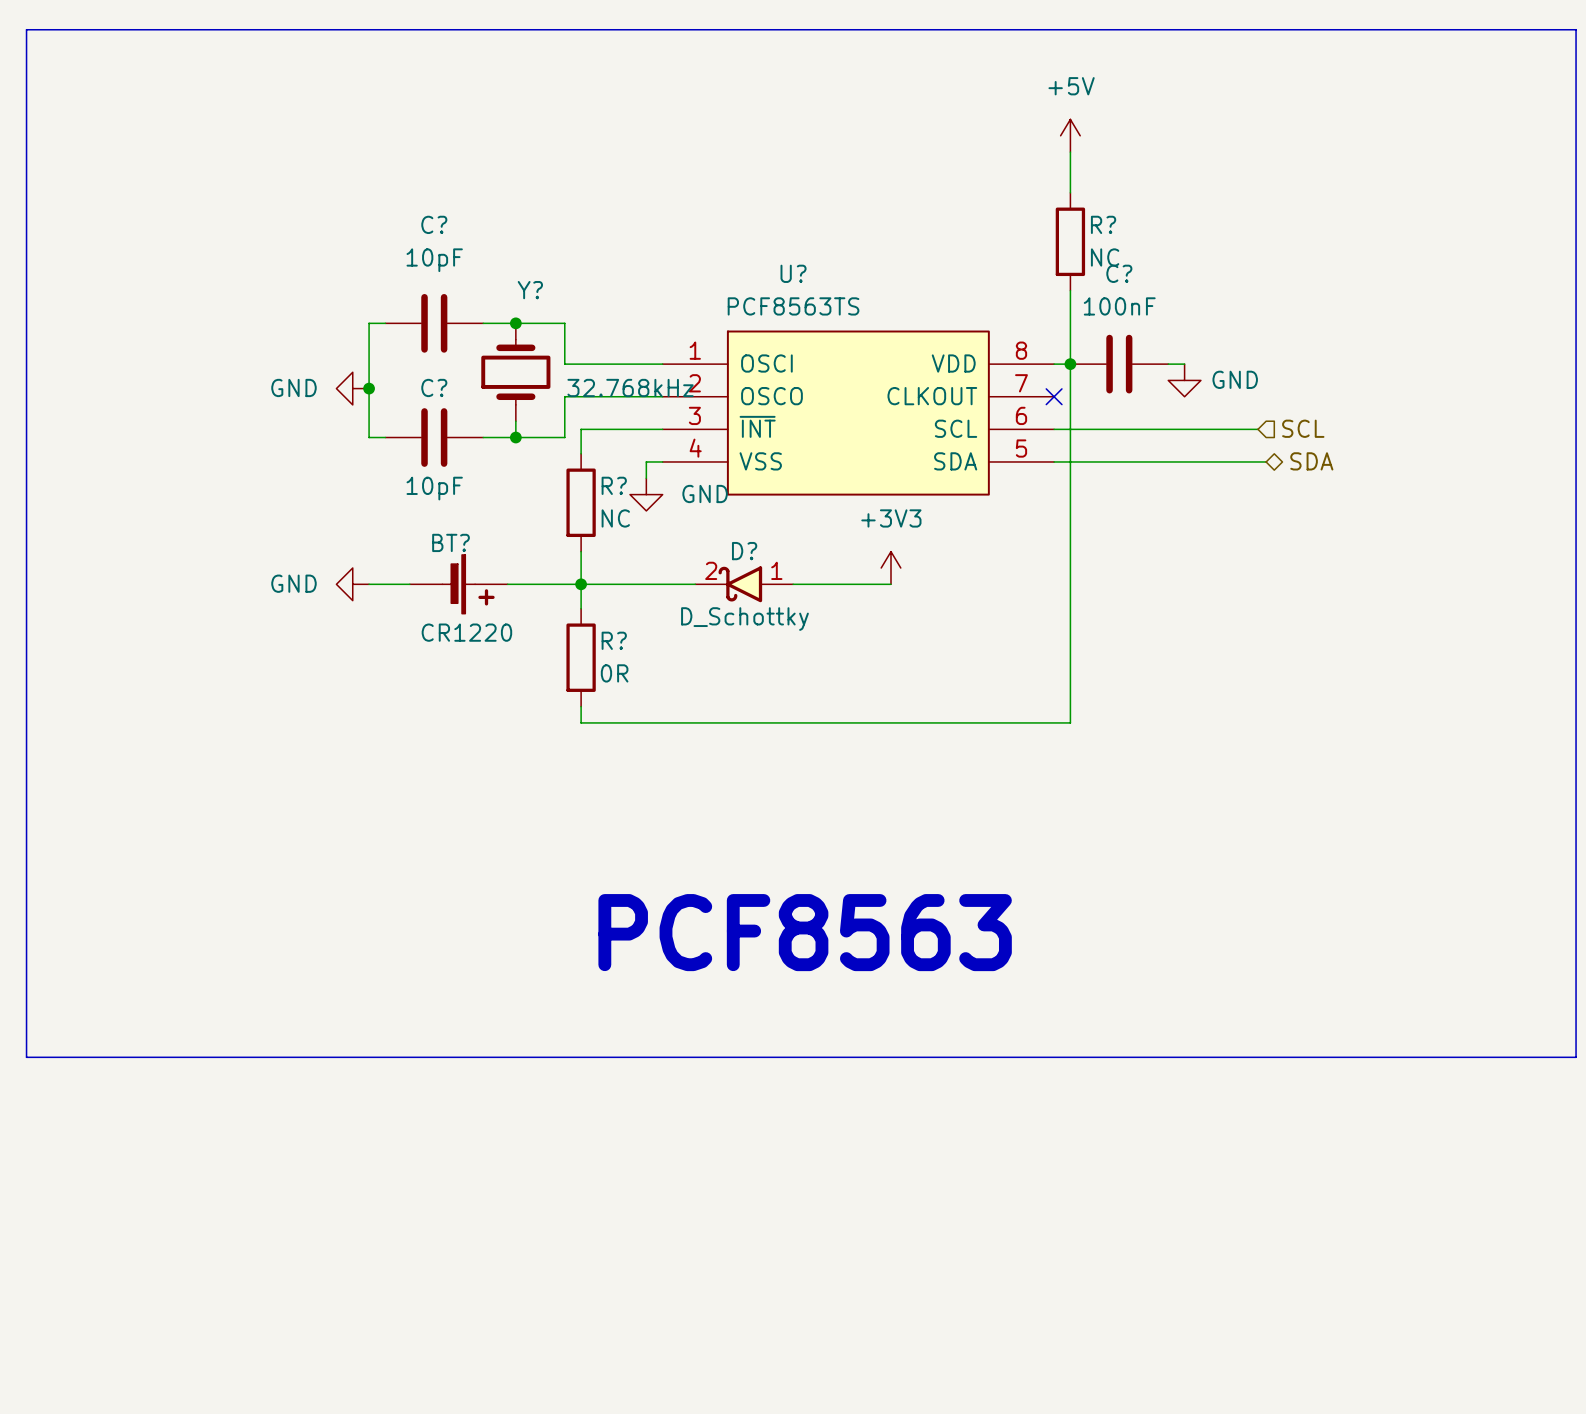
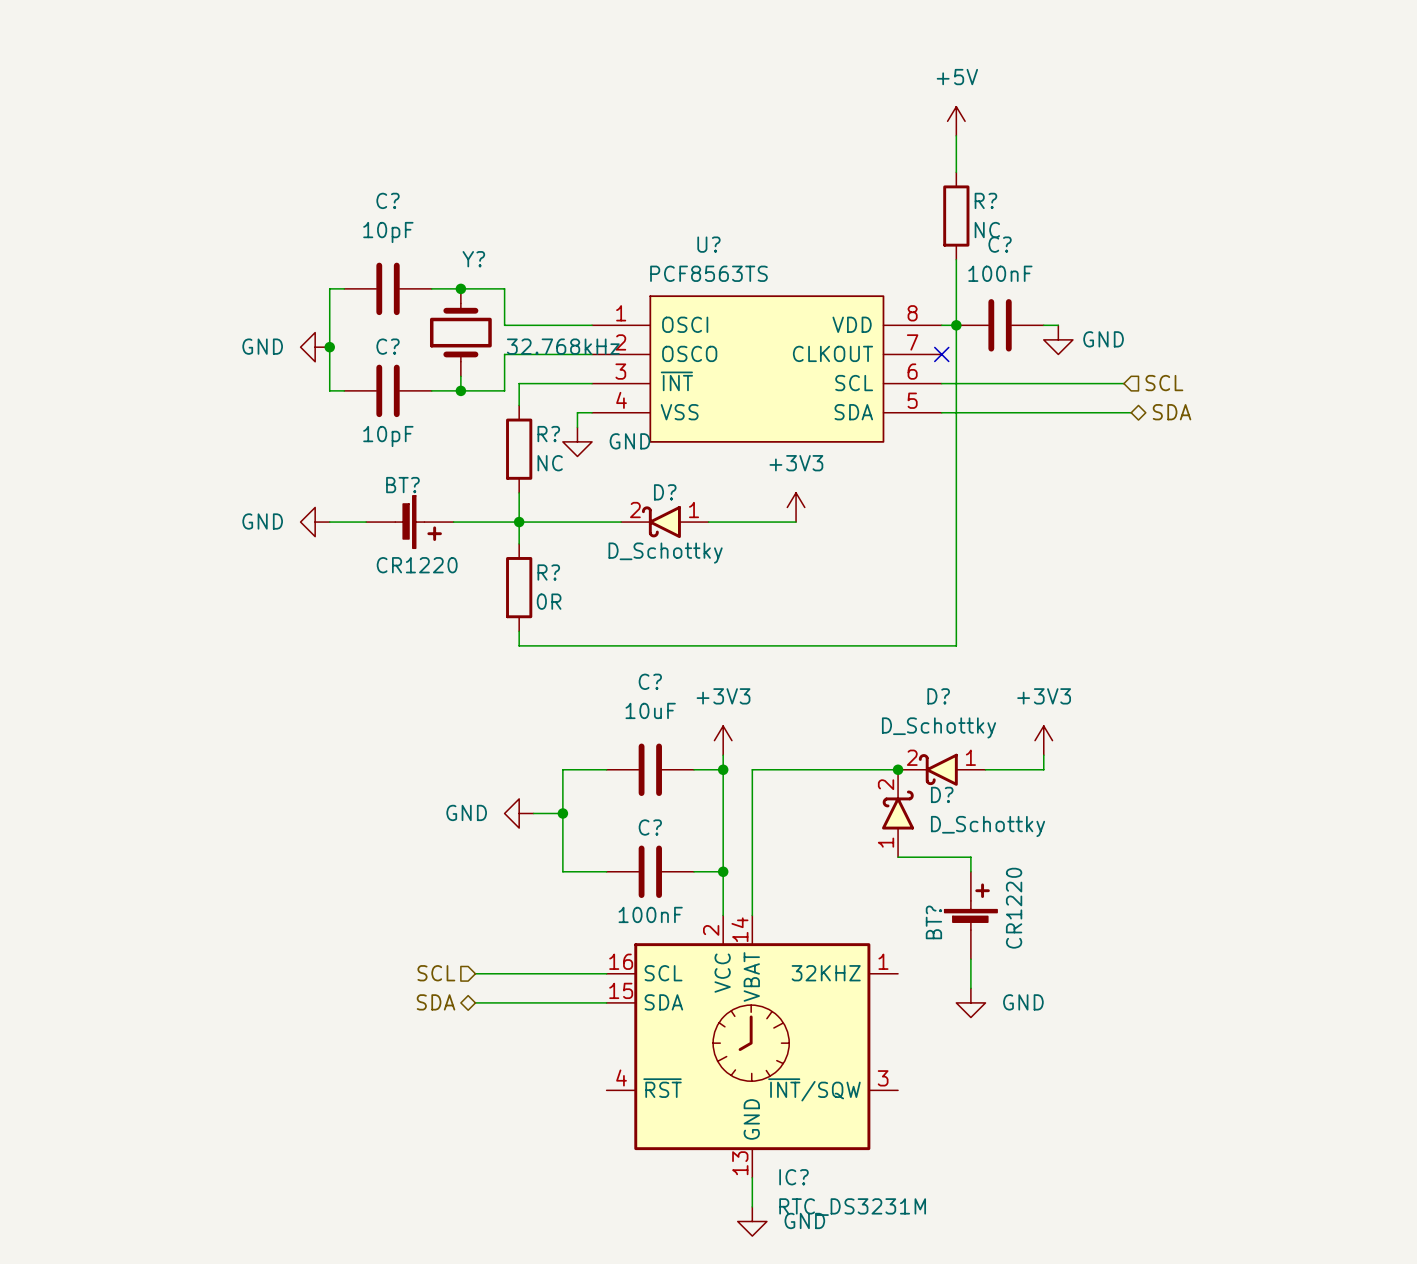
line: (26, 29) (26, 1057) (1576, 1057) (1576, 29) (26, 29) -> none
power symbol: none -> +3V3 (723, 740)
power symbol: none -> +3V3 (1043, 740)
wire: none -> (723, 755) (723, 915)
wire: none -> (1043, 755) (1043, 769) (985, 769)
wire: none -> (606, 769) (562, 769) (562, 871) (606, 871)
C?: none -> 10uF (650, 769)
wire: none -> (694, 769) (723, 769)
junction: none -> (723, 769)
wire: none -> (898, 769) (752, 769) (752, 915)
junction: none -> (898, 769)
D?: none -> D_Schottky (941, 769)
power symbol: none -> GND (519, 813)
wire: none -> (533, 813) (562, 813)
junction: none -> (562, 813)
D?: none -> D_Schottky (898, 813)
text: PCF8563 (805, 932) -> none
wire: none -> (898, 857) (970, 857) (970, 871)
C?: none -> 100nF (650, 871)
wire: none -> (694, 871) (723, 871)
junction: none -> (723, 871)
BT?: none -> CR1220 (970, 915)
wire: none -> (970, 959) (970, 988)
hierarchical label: none -> SCL (436, 973)
wire: none -> (475, 973) (606, 973)
hierarchical label: none -> SDA (436, 1002)
wire: none -> (475, 1002) (606, 1002)
power symbol: none -> GND (970, 1002)
IC?: none -> RTC_DS3231M (752, 1046)
wire: none -> (752, 1177) (752, 1206)
power symbol: none -> GND (752, 1221)

